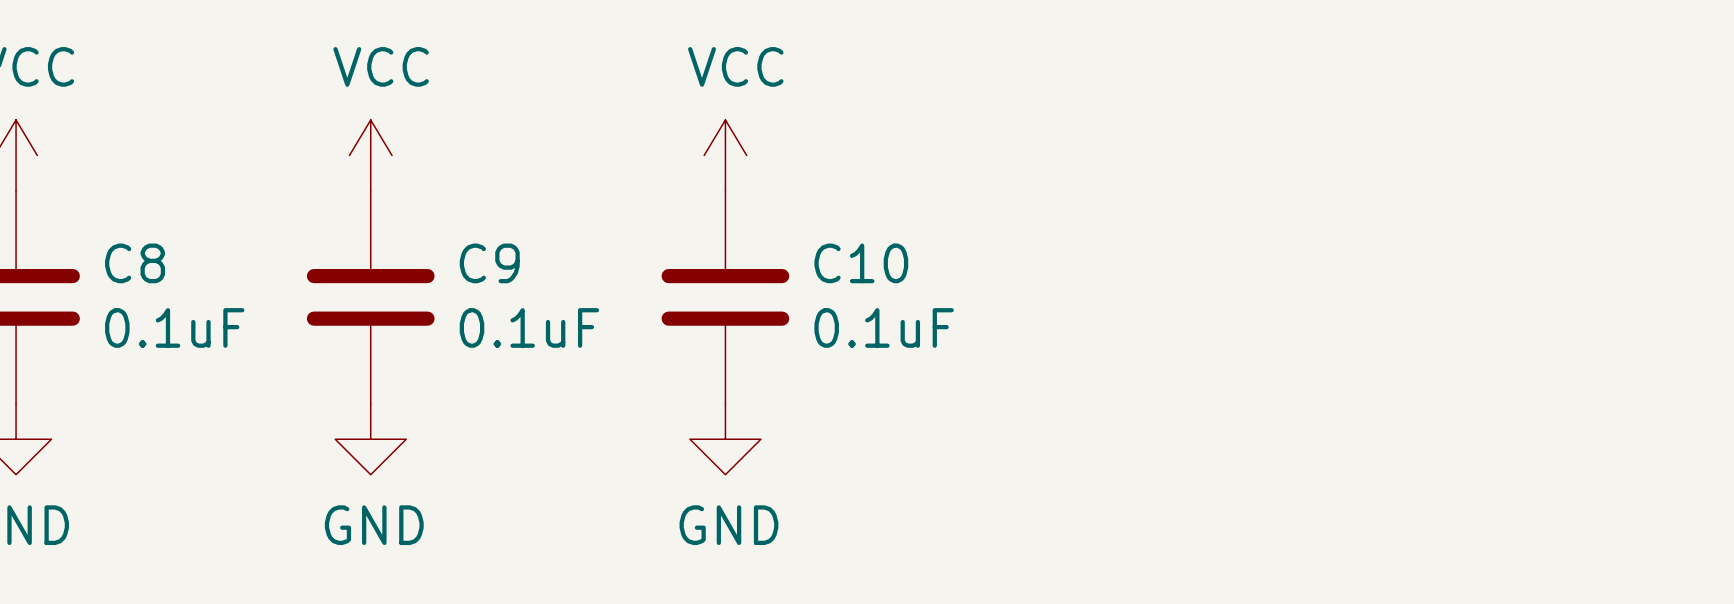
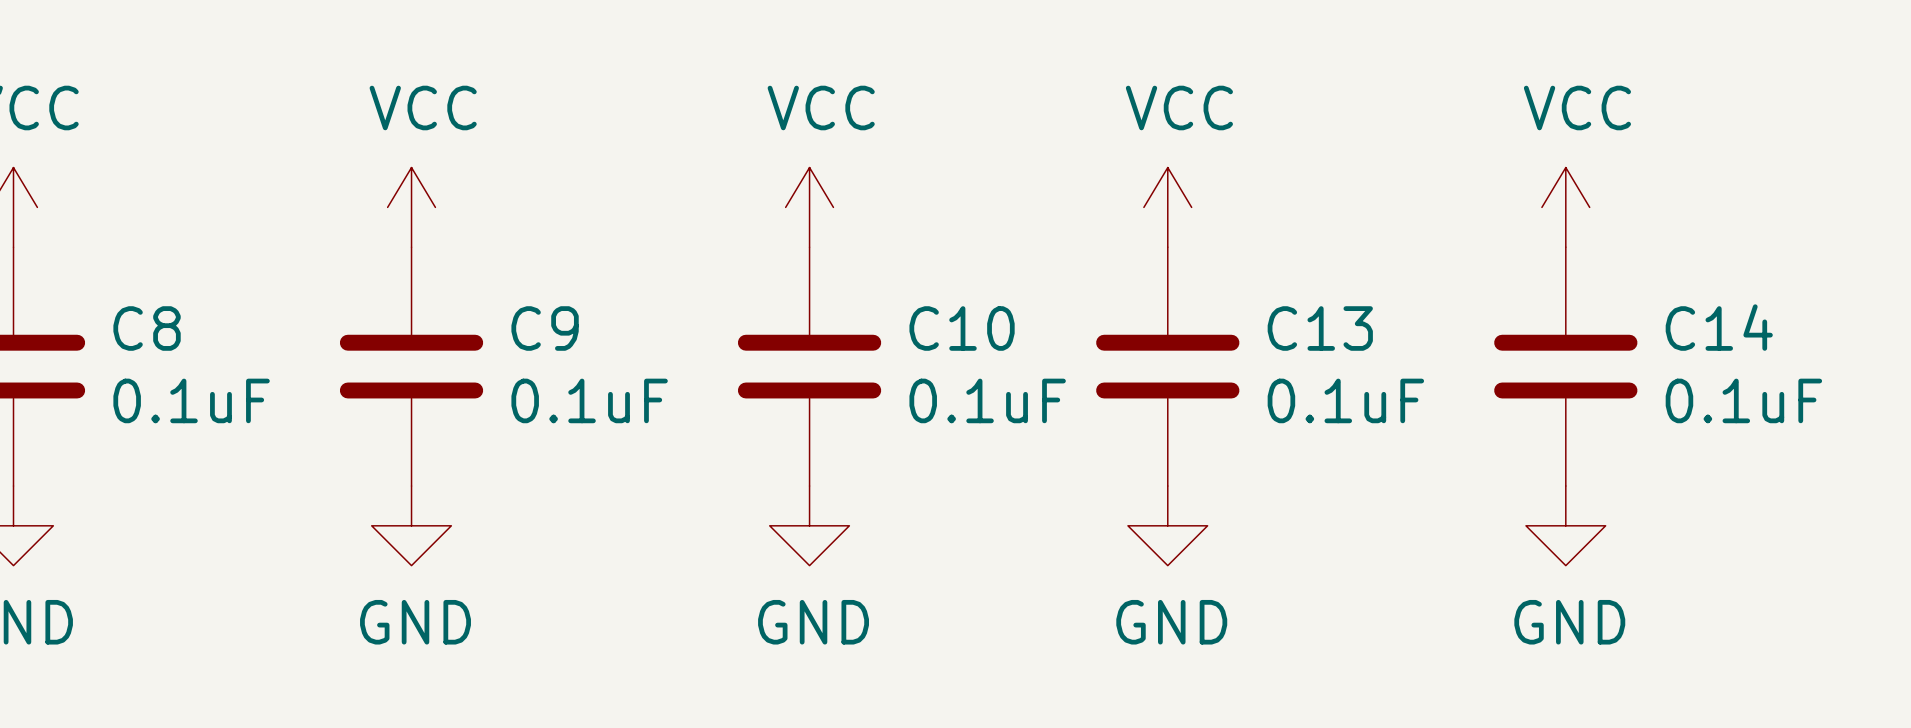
power symbol: none -> VCC (1167, 207)
power symbol: none -> VCC (1565, 207)
C13: none -> 0.1uF (1167, 366)
C14: none -> 0.1uF (1565, 366)
power symbol: none -> GND (1167, 525)
power symbol: none -> GND (1565, 525)

